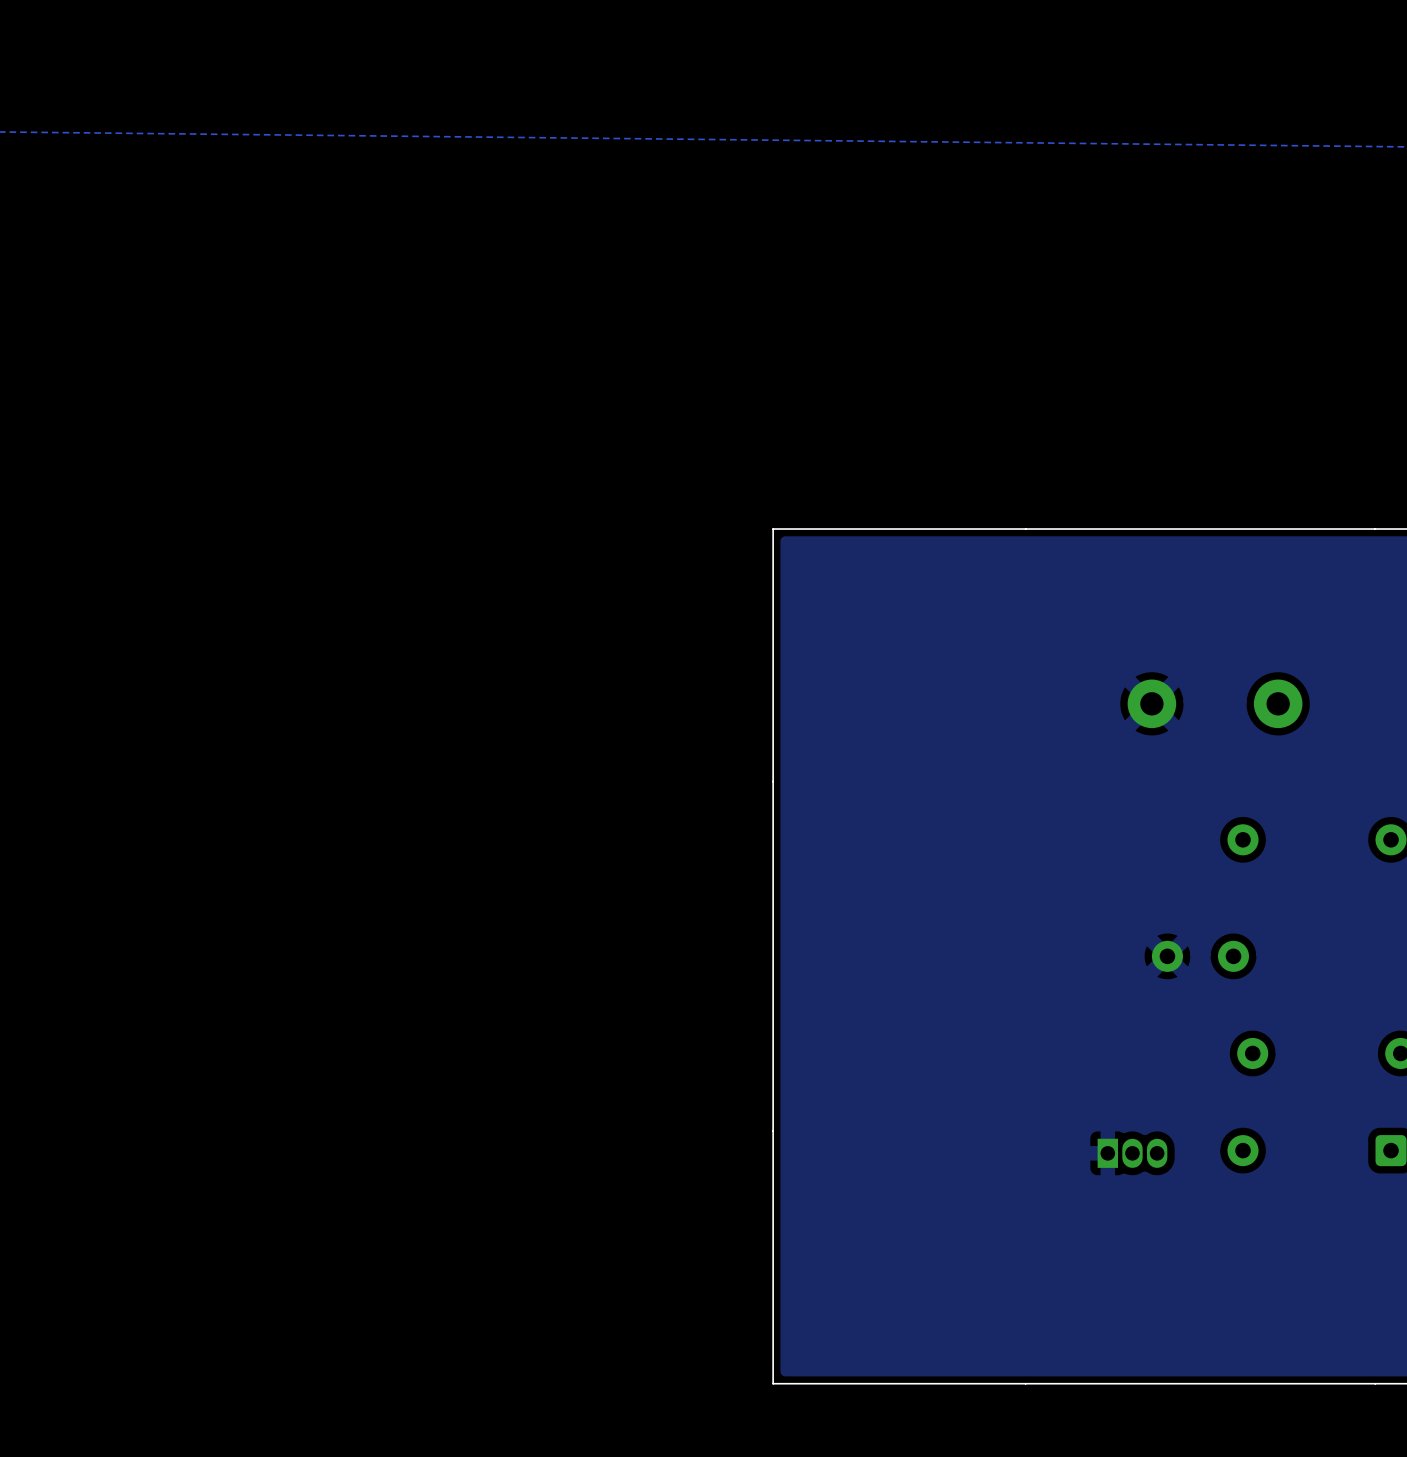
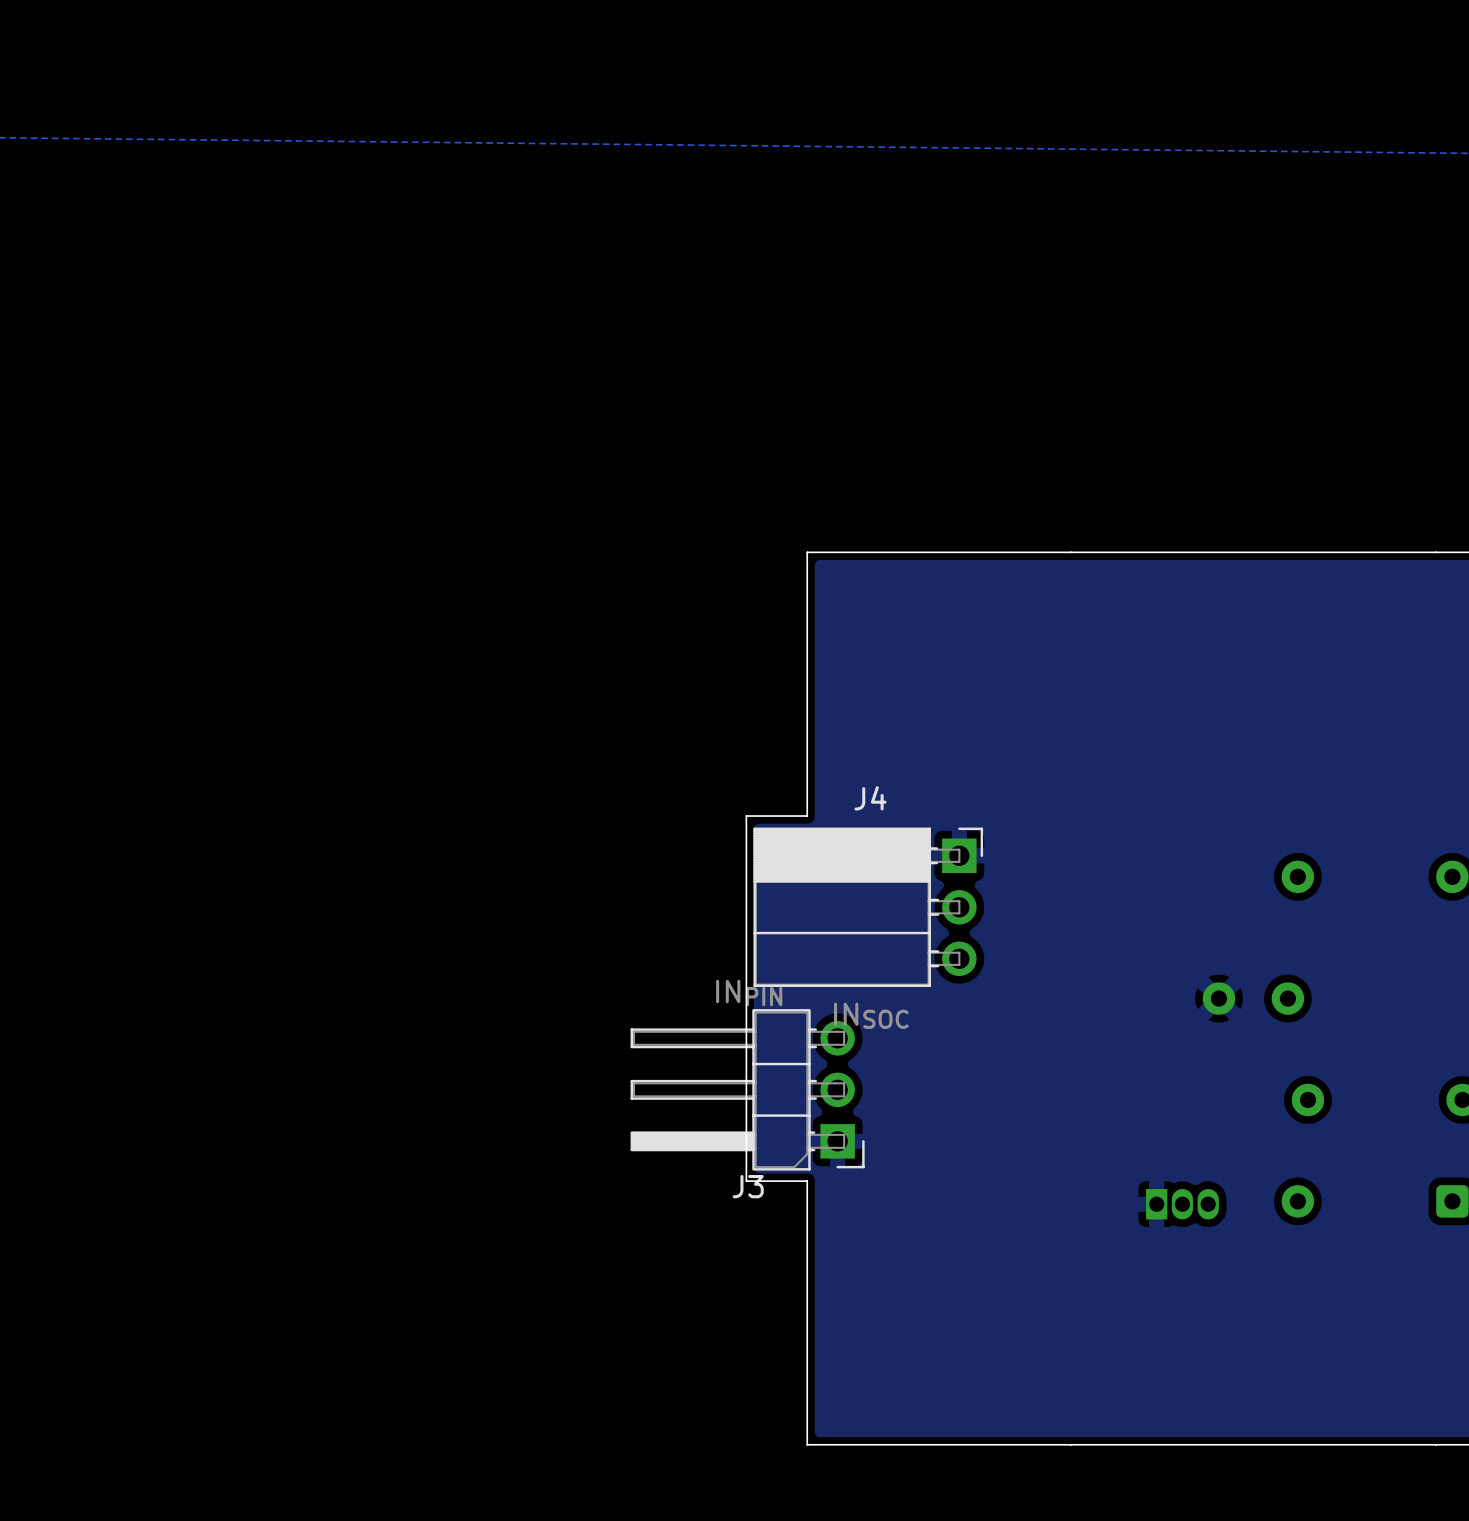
part: (1151, 703) -> none
part: (1278, 703) -> none
board edge: (773, 781) (773, 1131) -> (807, 816) (746, 816) (746, 1181) (807, 1181)
J4: none -> INSOC (868, 907)
J3: none -> INPIN (747, 1089)

